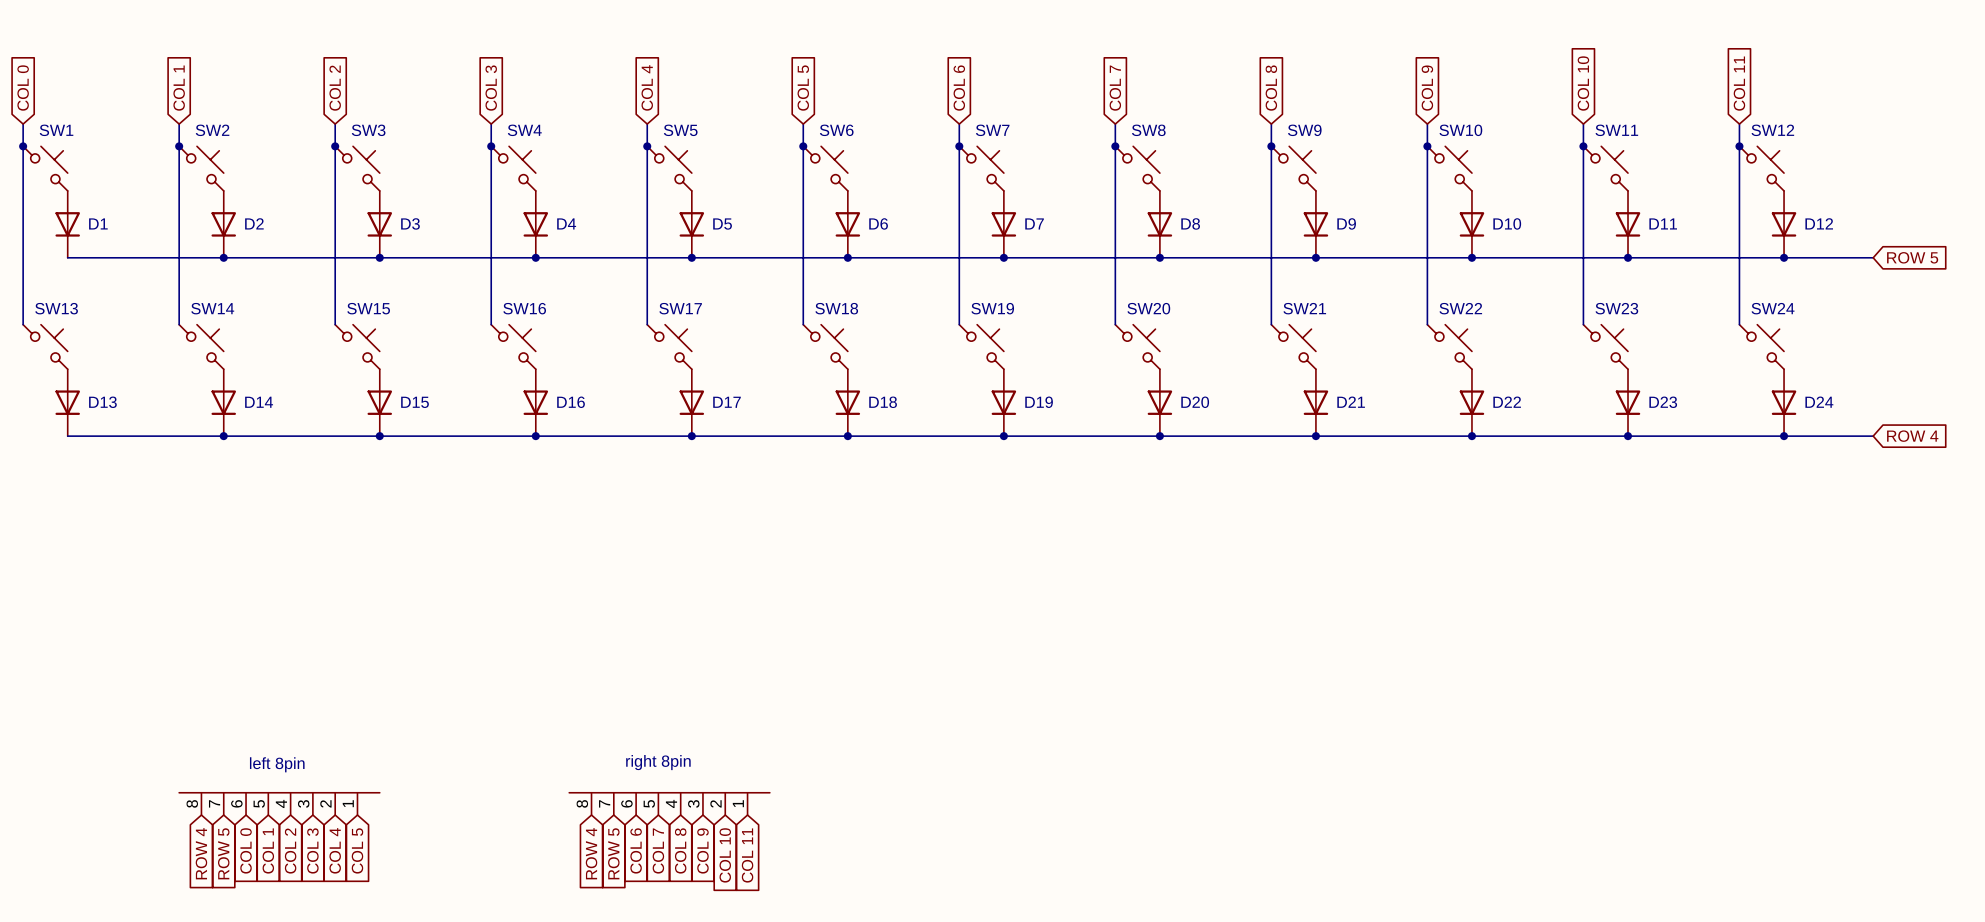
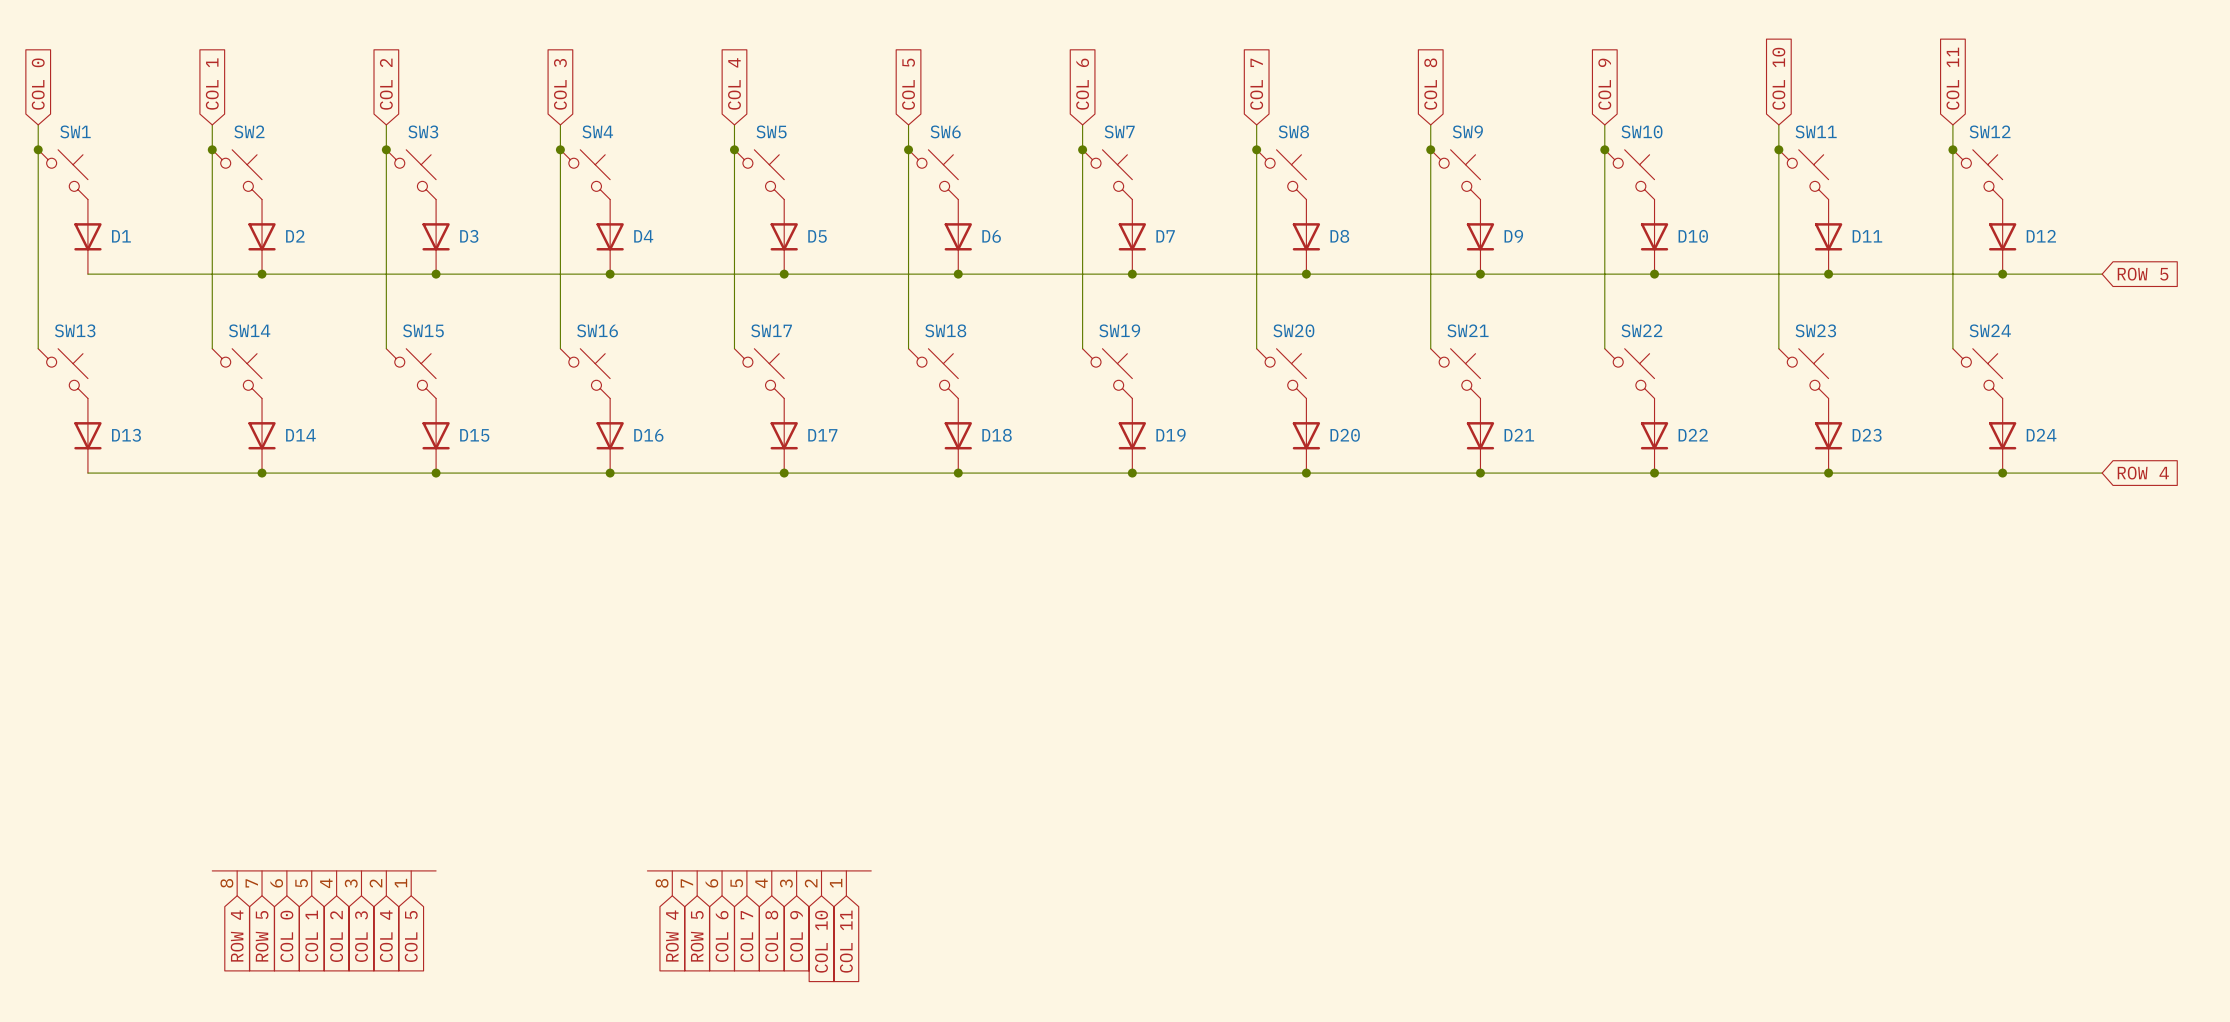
text: right 8pin (658, 762) -> none
text: left 8pin (277, 764) -> none

